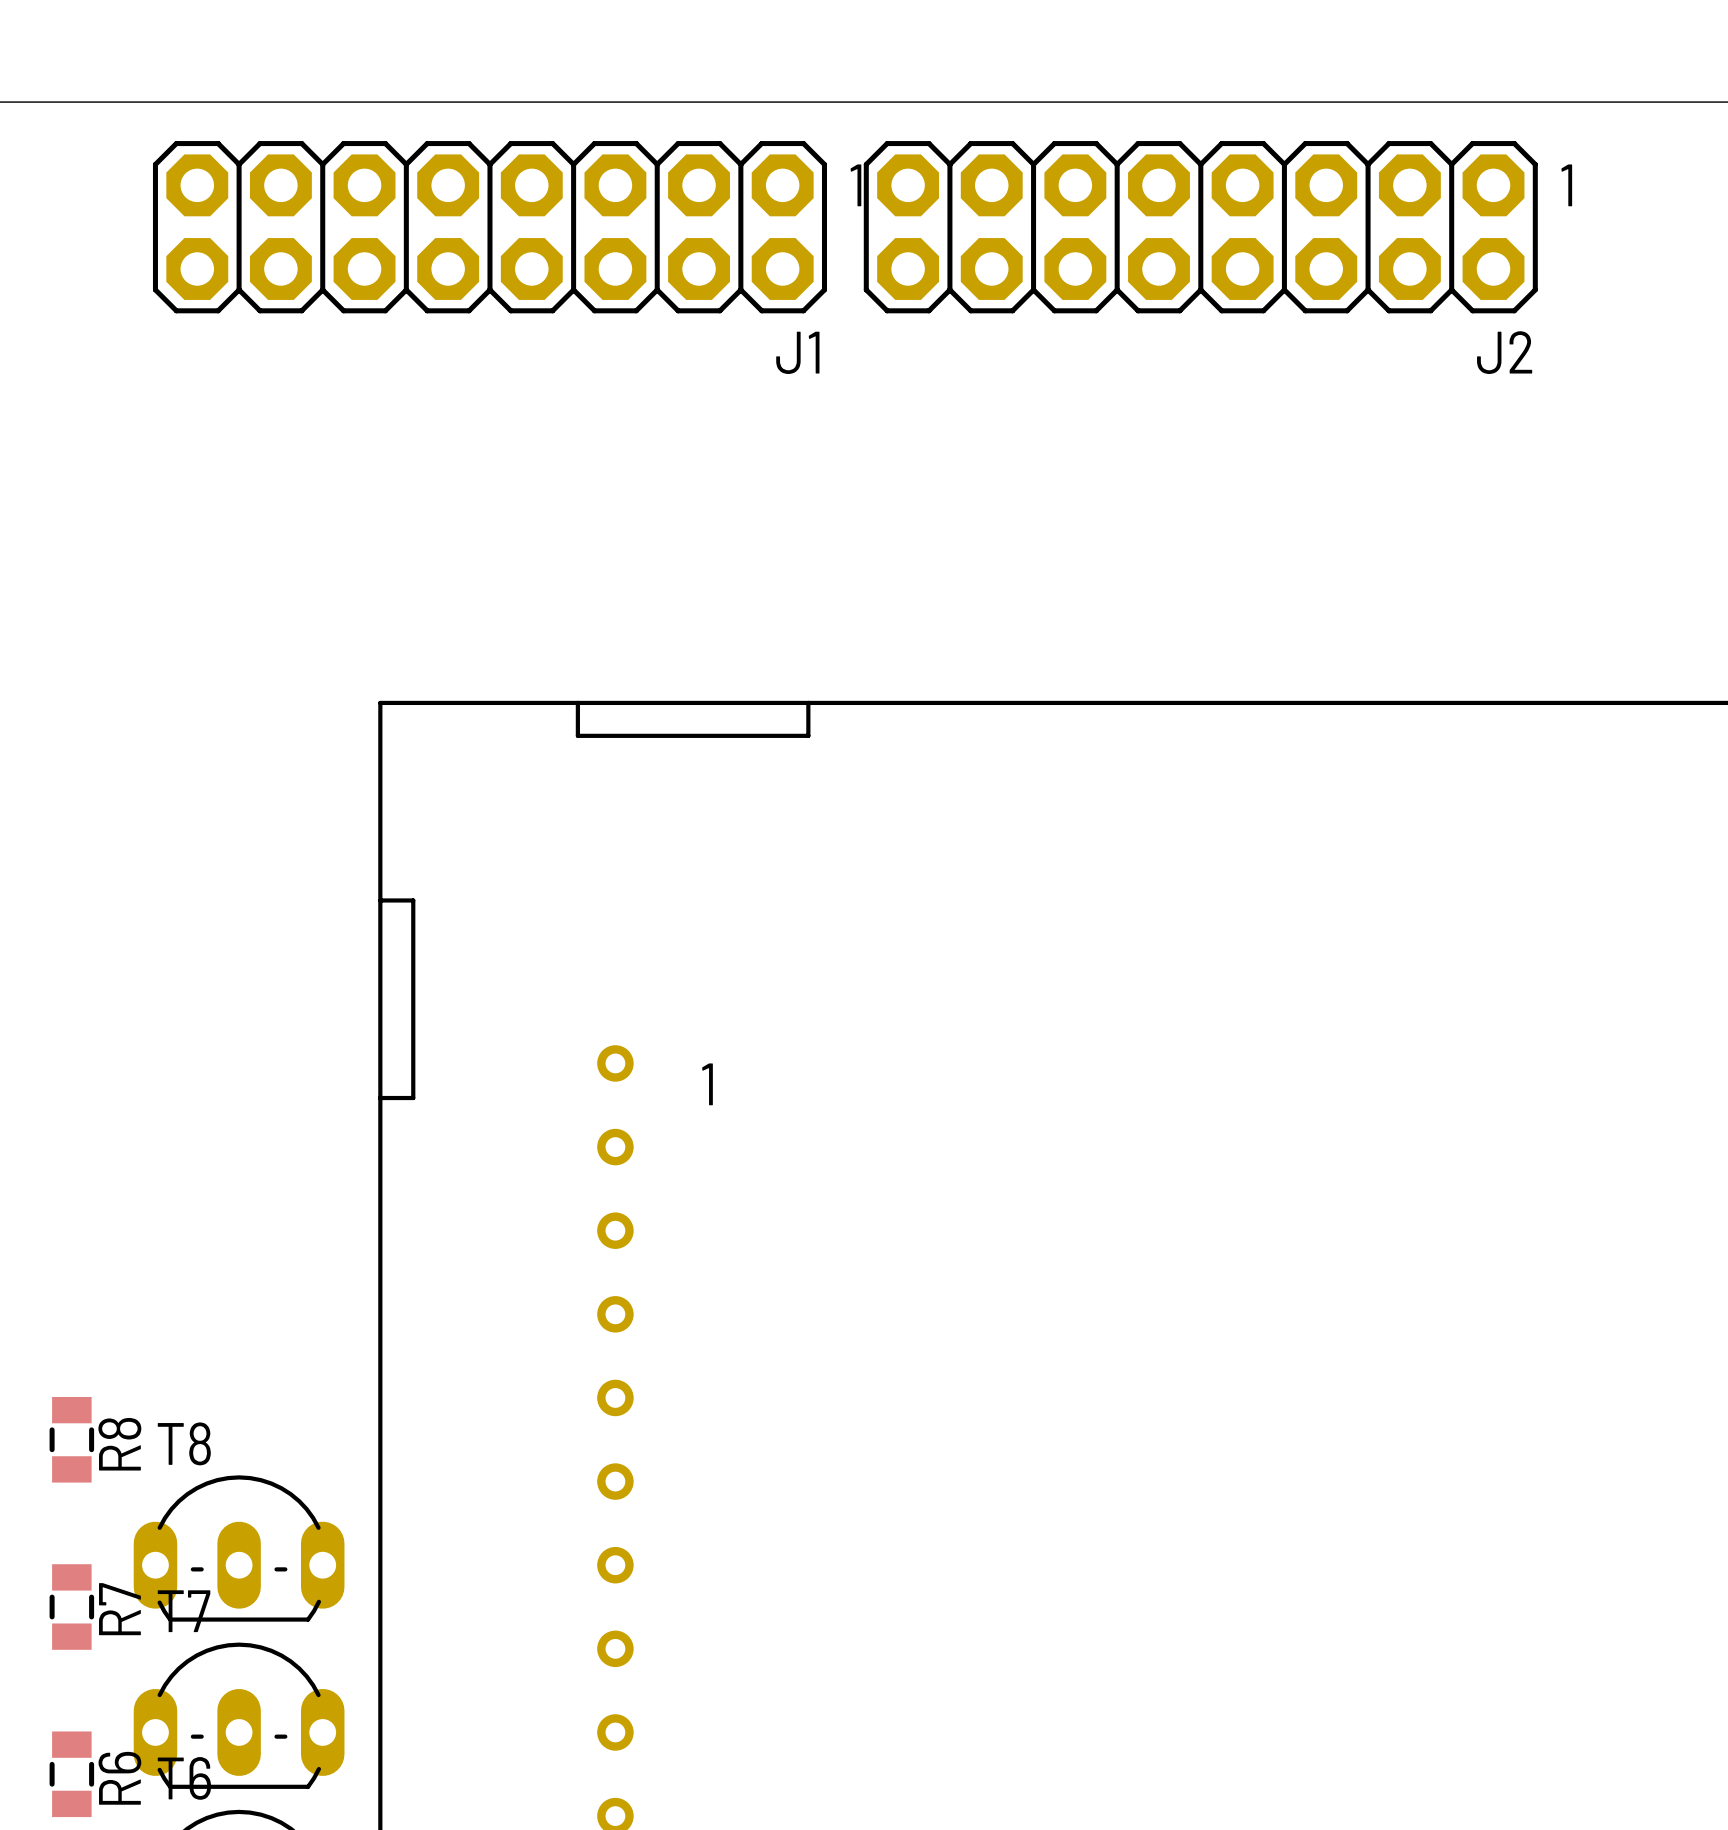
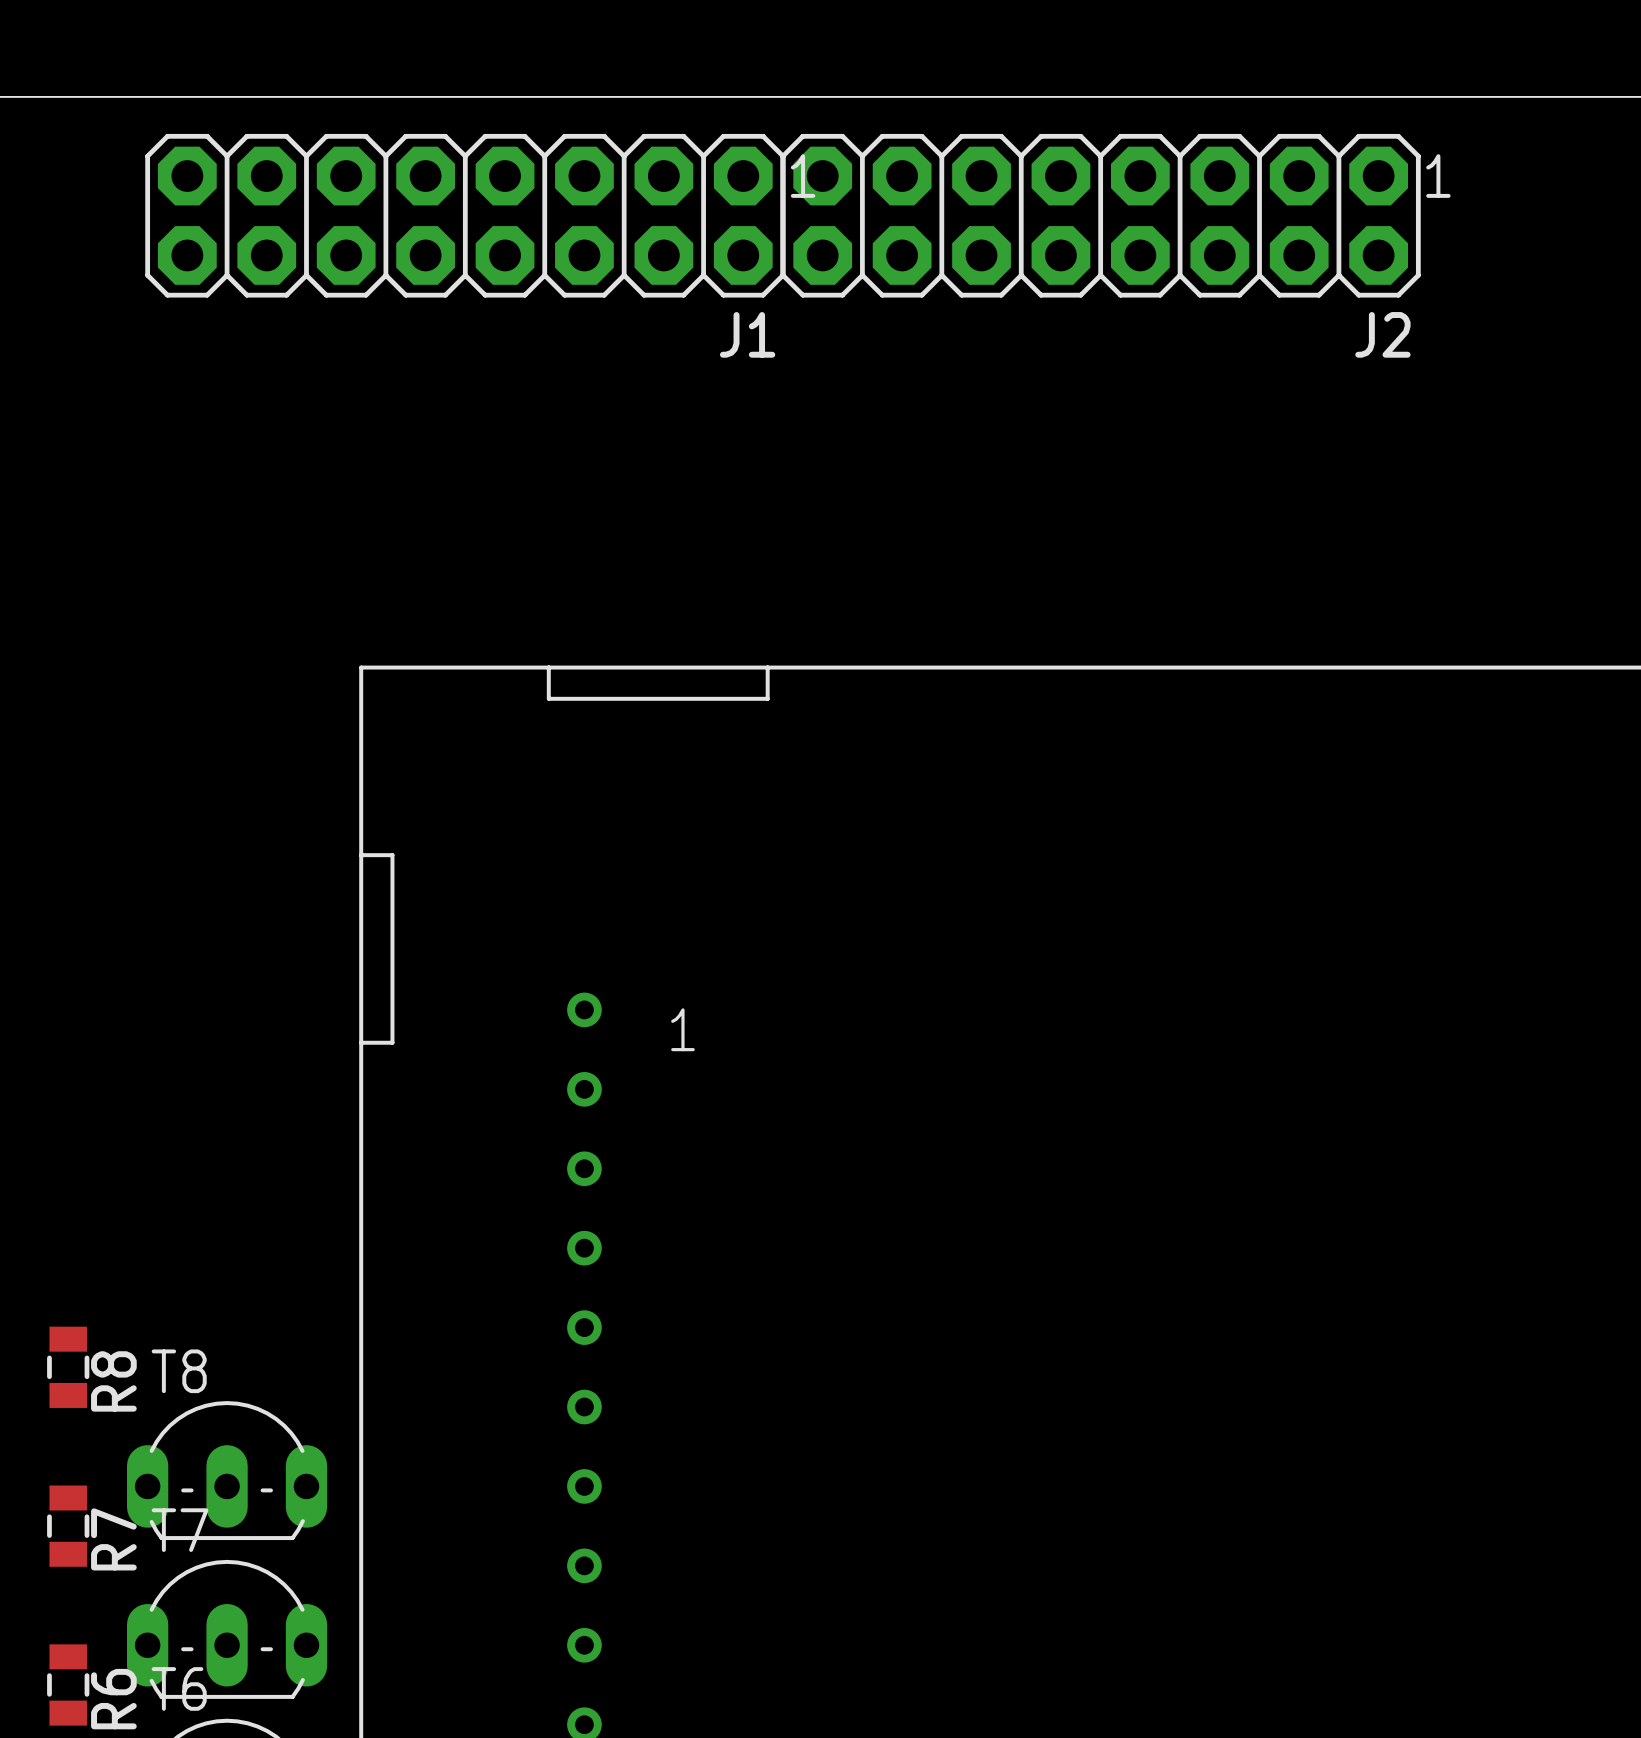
J2 position: (1200, 227) -> (1100, 215)

